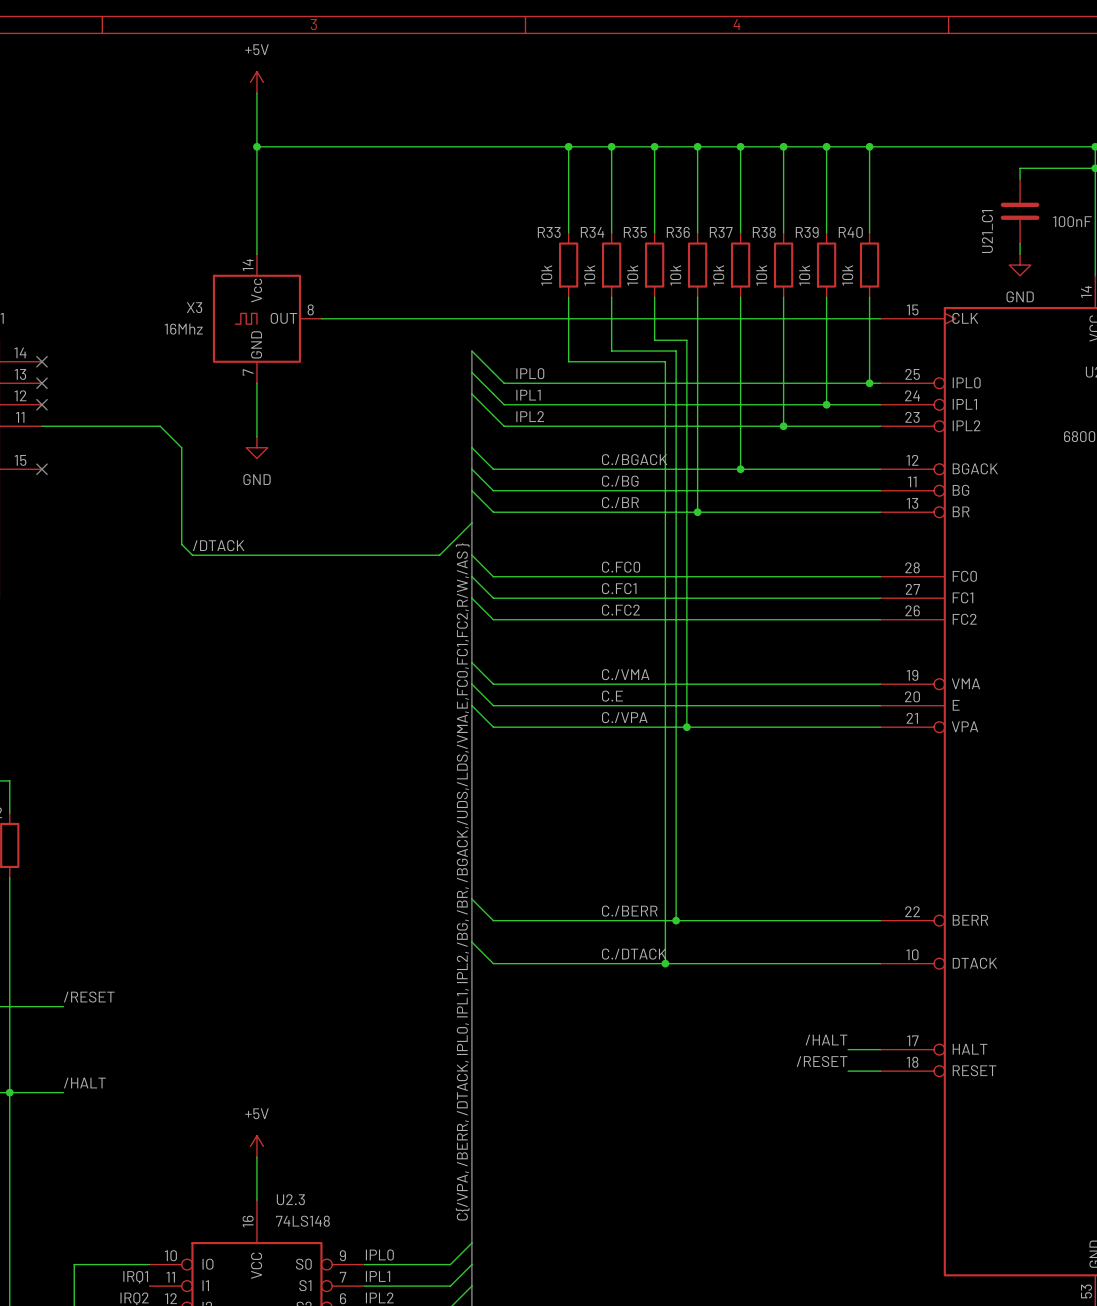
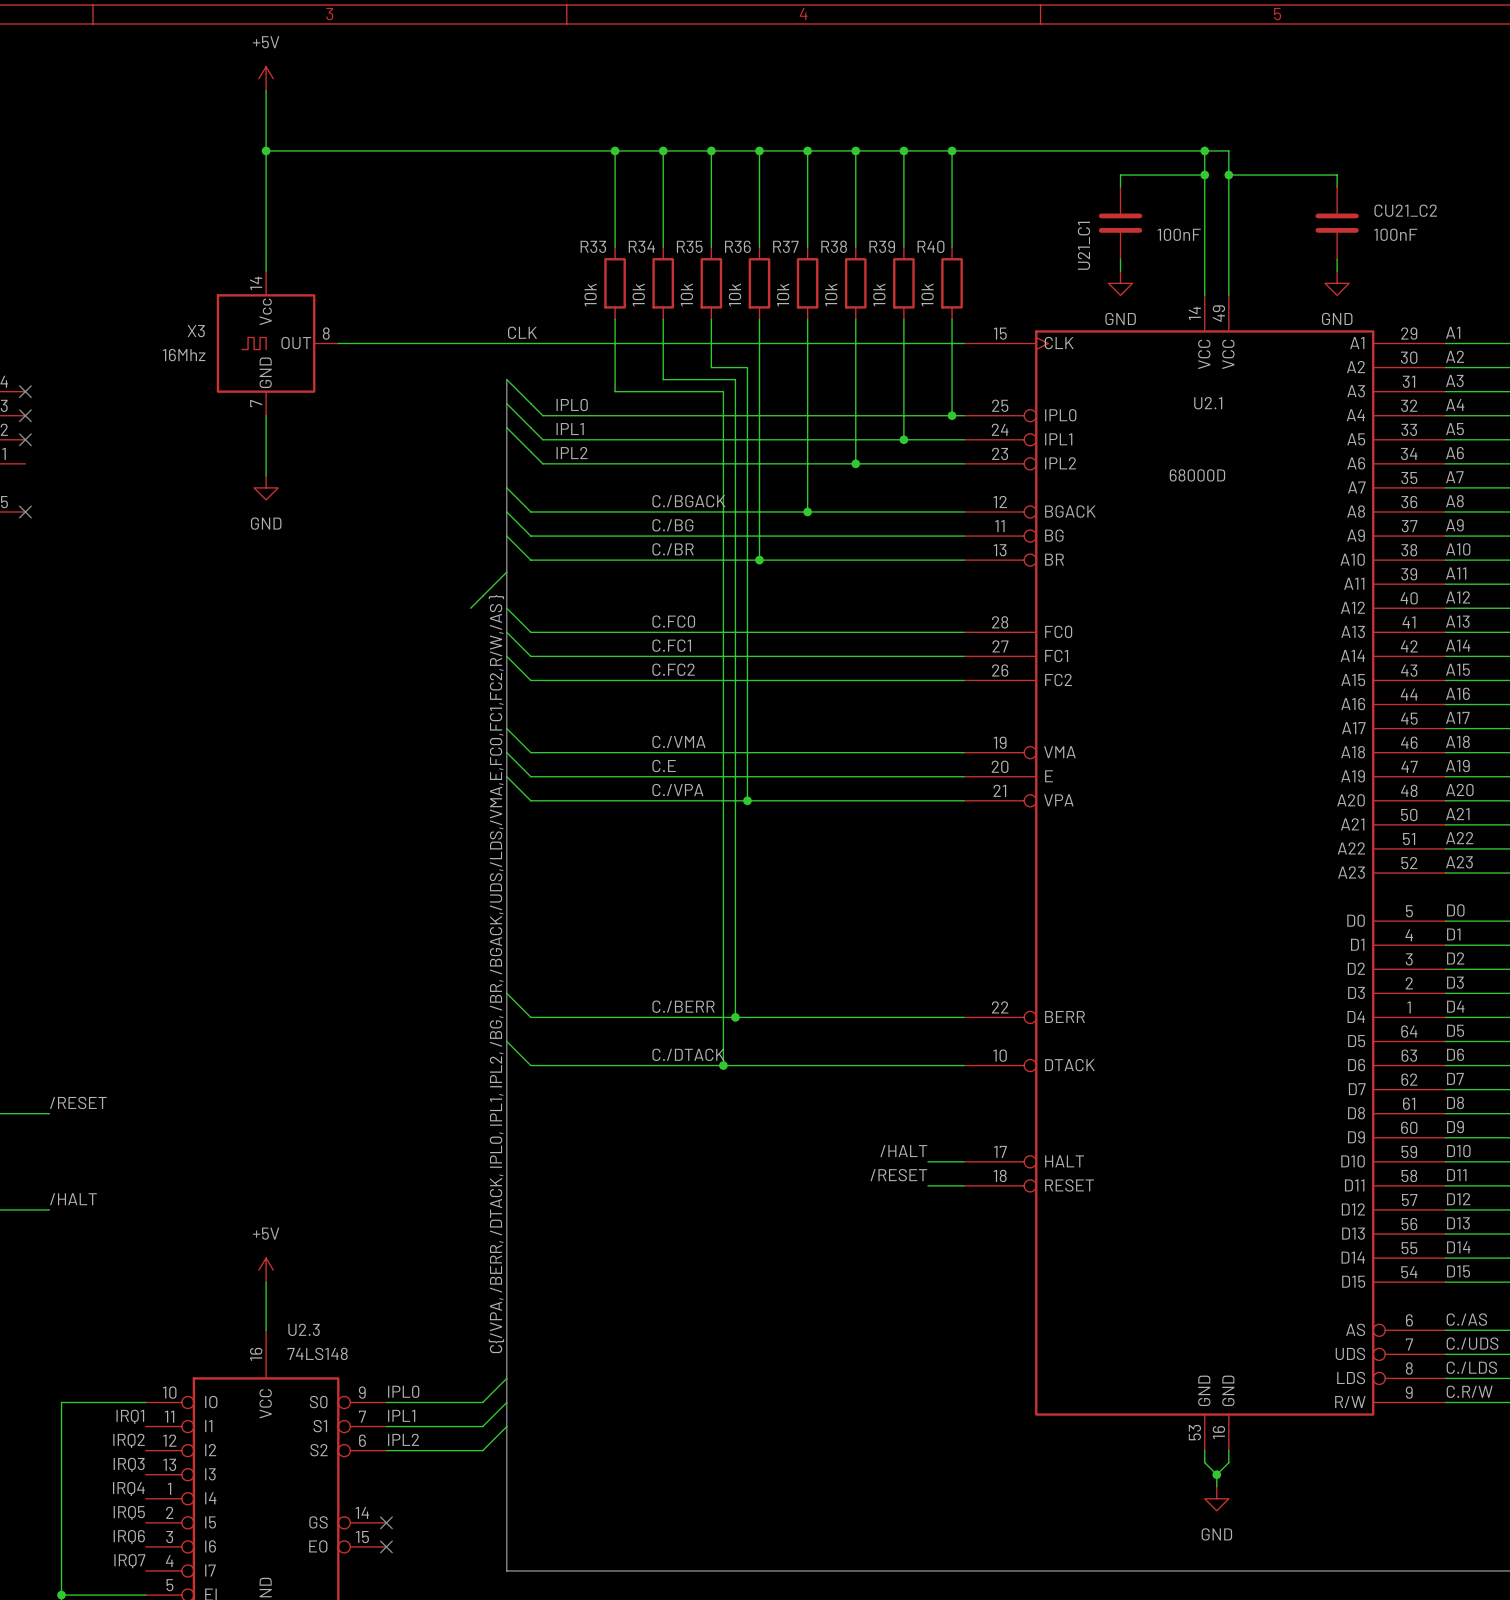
label: none -> CLK (522, 332)
wire: (42, 426) (160, 426) (181, 447) (181, 544) (192, 555) (439, 555) -> none
label: /DTACK (218, 545) -> none

